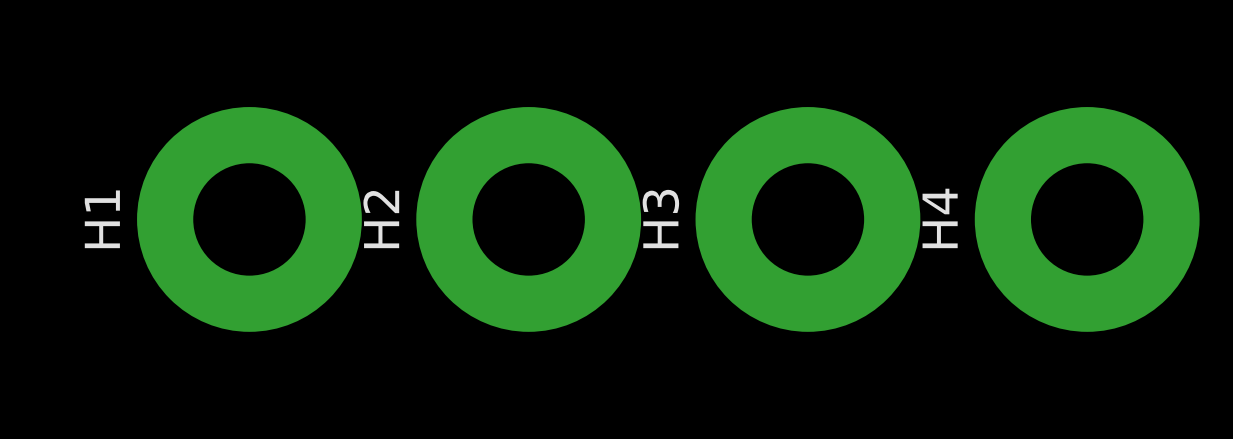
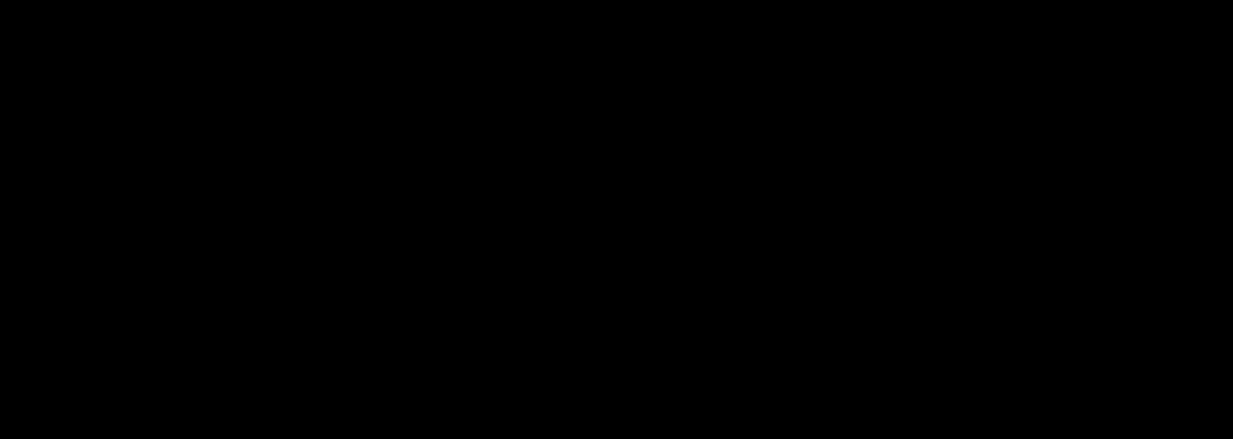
H1: (249, 219) -> none
H2: (528, 219) -> none
H3: (807, 219) -> none
H4: (1087, 219) -> none

